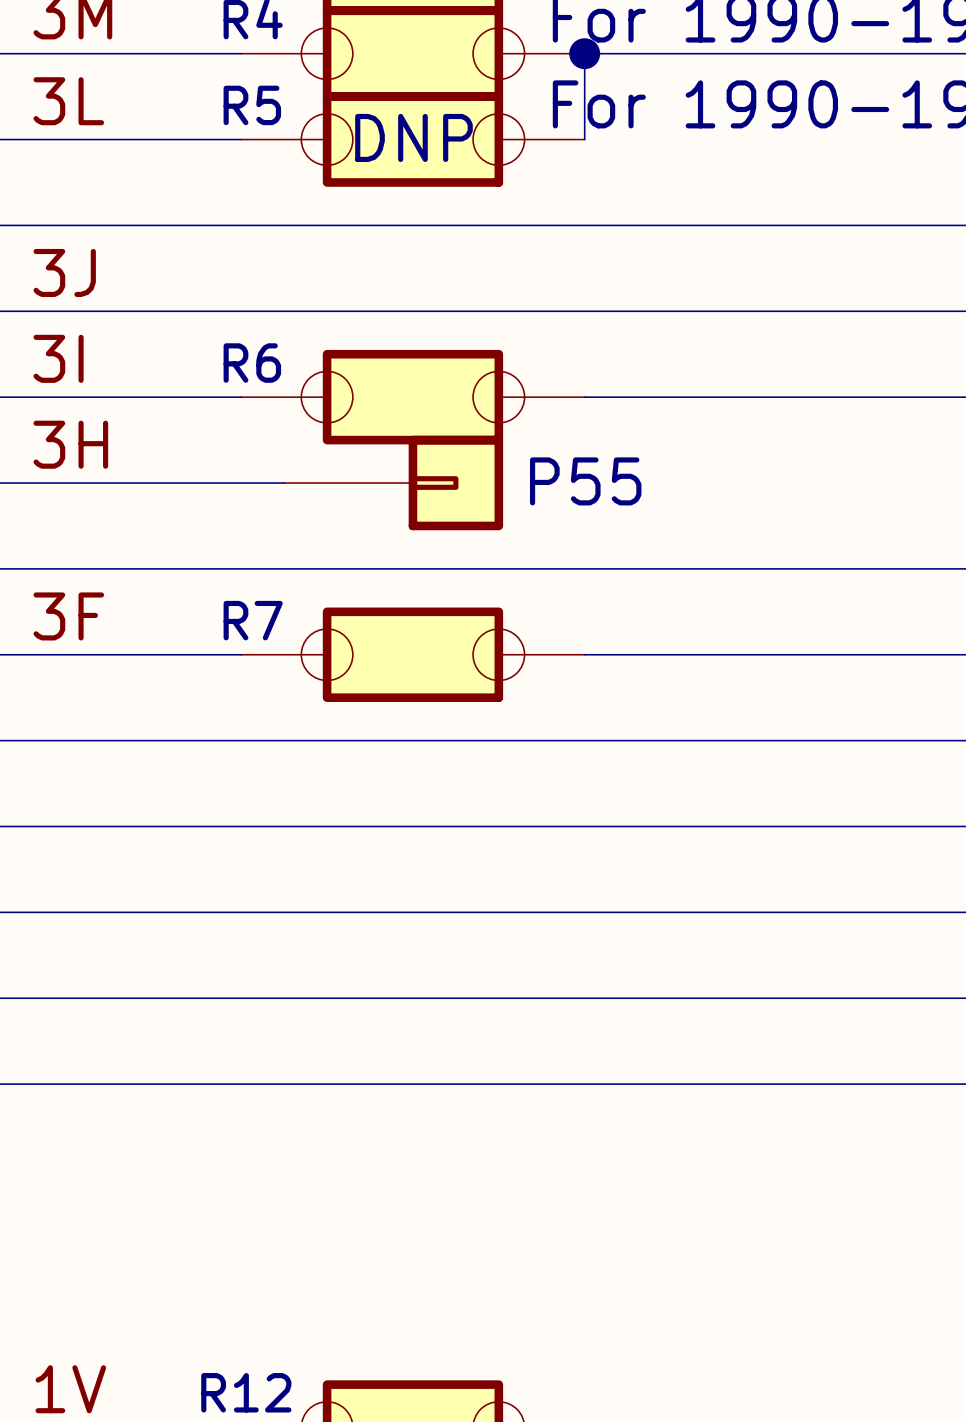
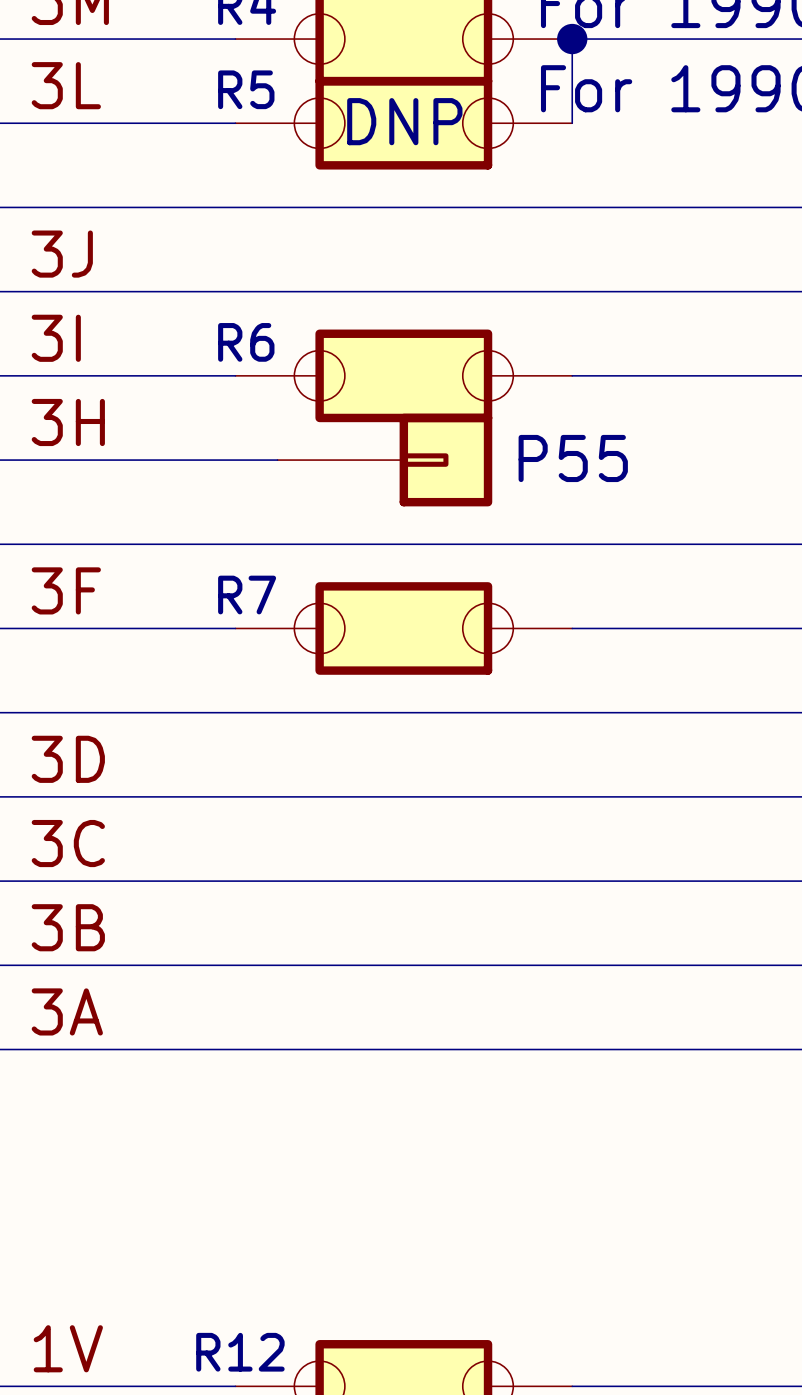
label: none -> 3D (68, 759)
label: none -> 3C (68, 843)
label: none -> 3B (68, 927)
label: none -> 3A (67, 1011)

